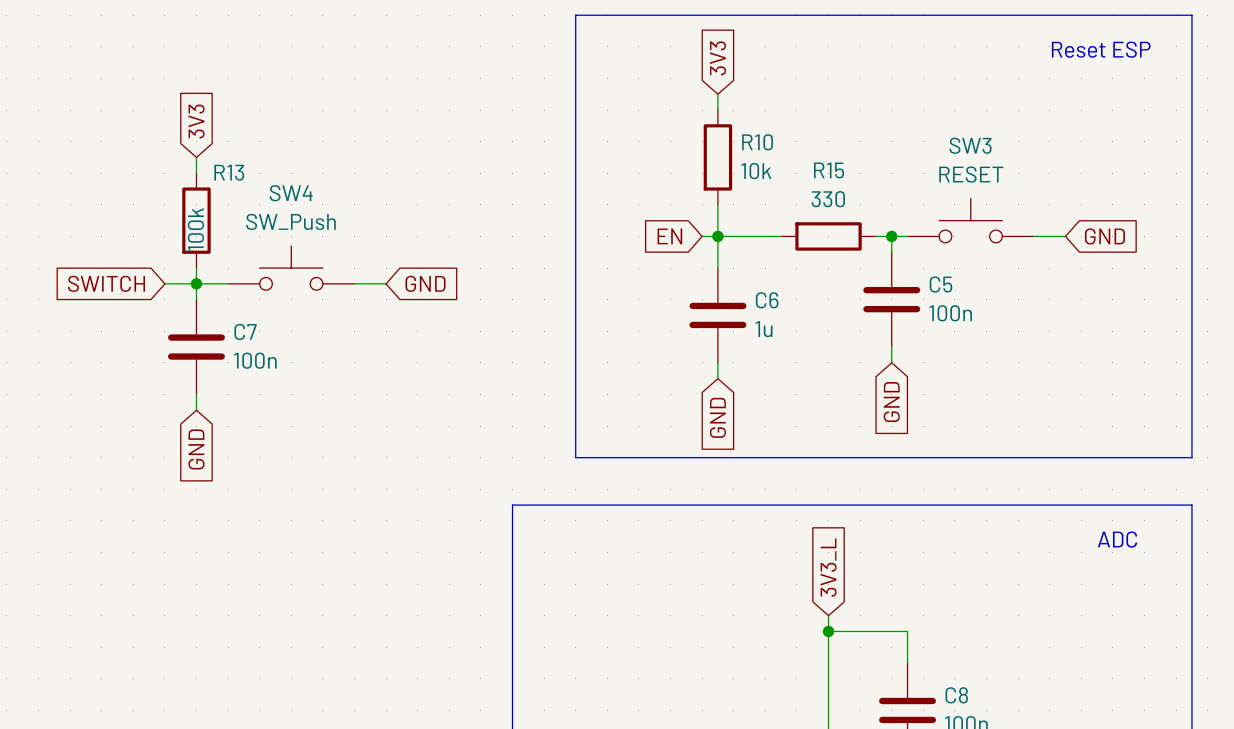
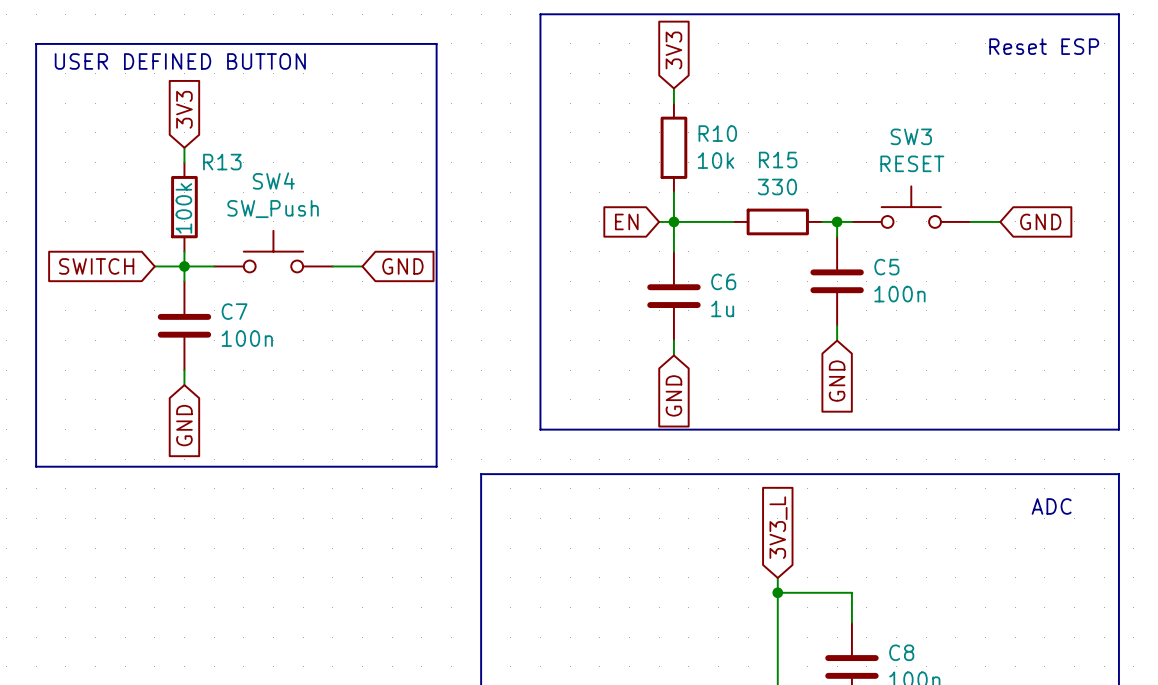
line: none -> (36, 43) (36, 466) (436, 466) (436, 43) (36, 43)
text: none -> USER DEFINED BUTTON (180, 61)

